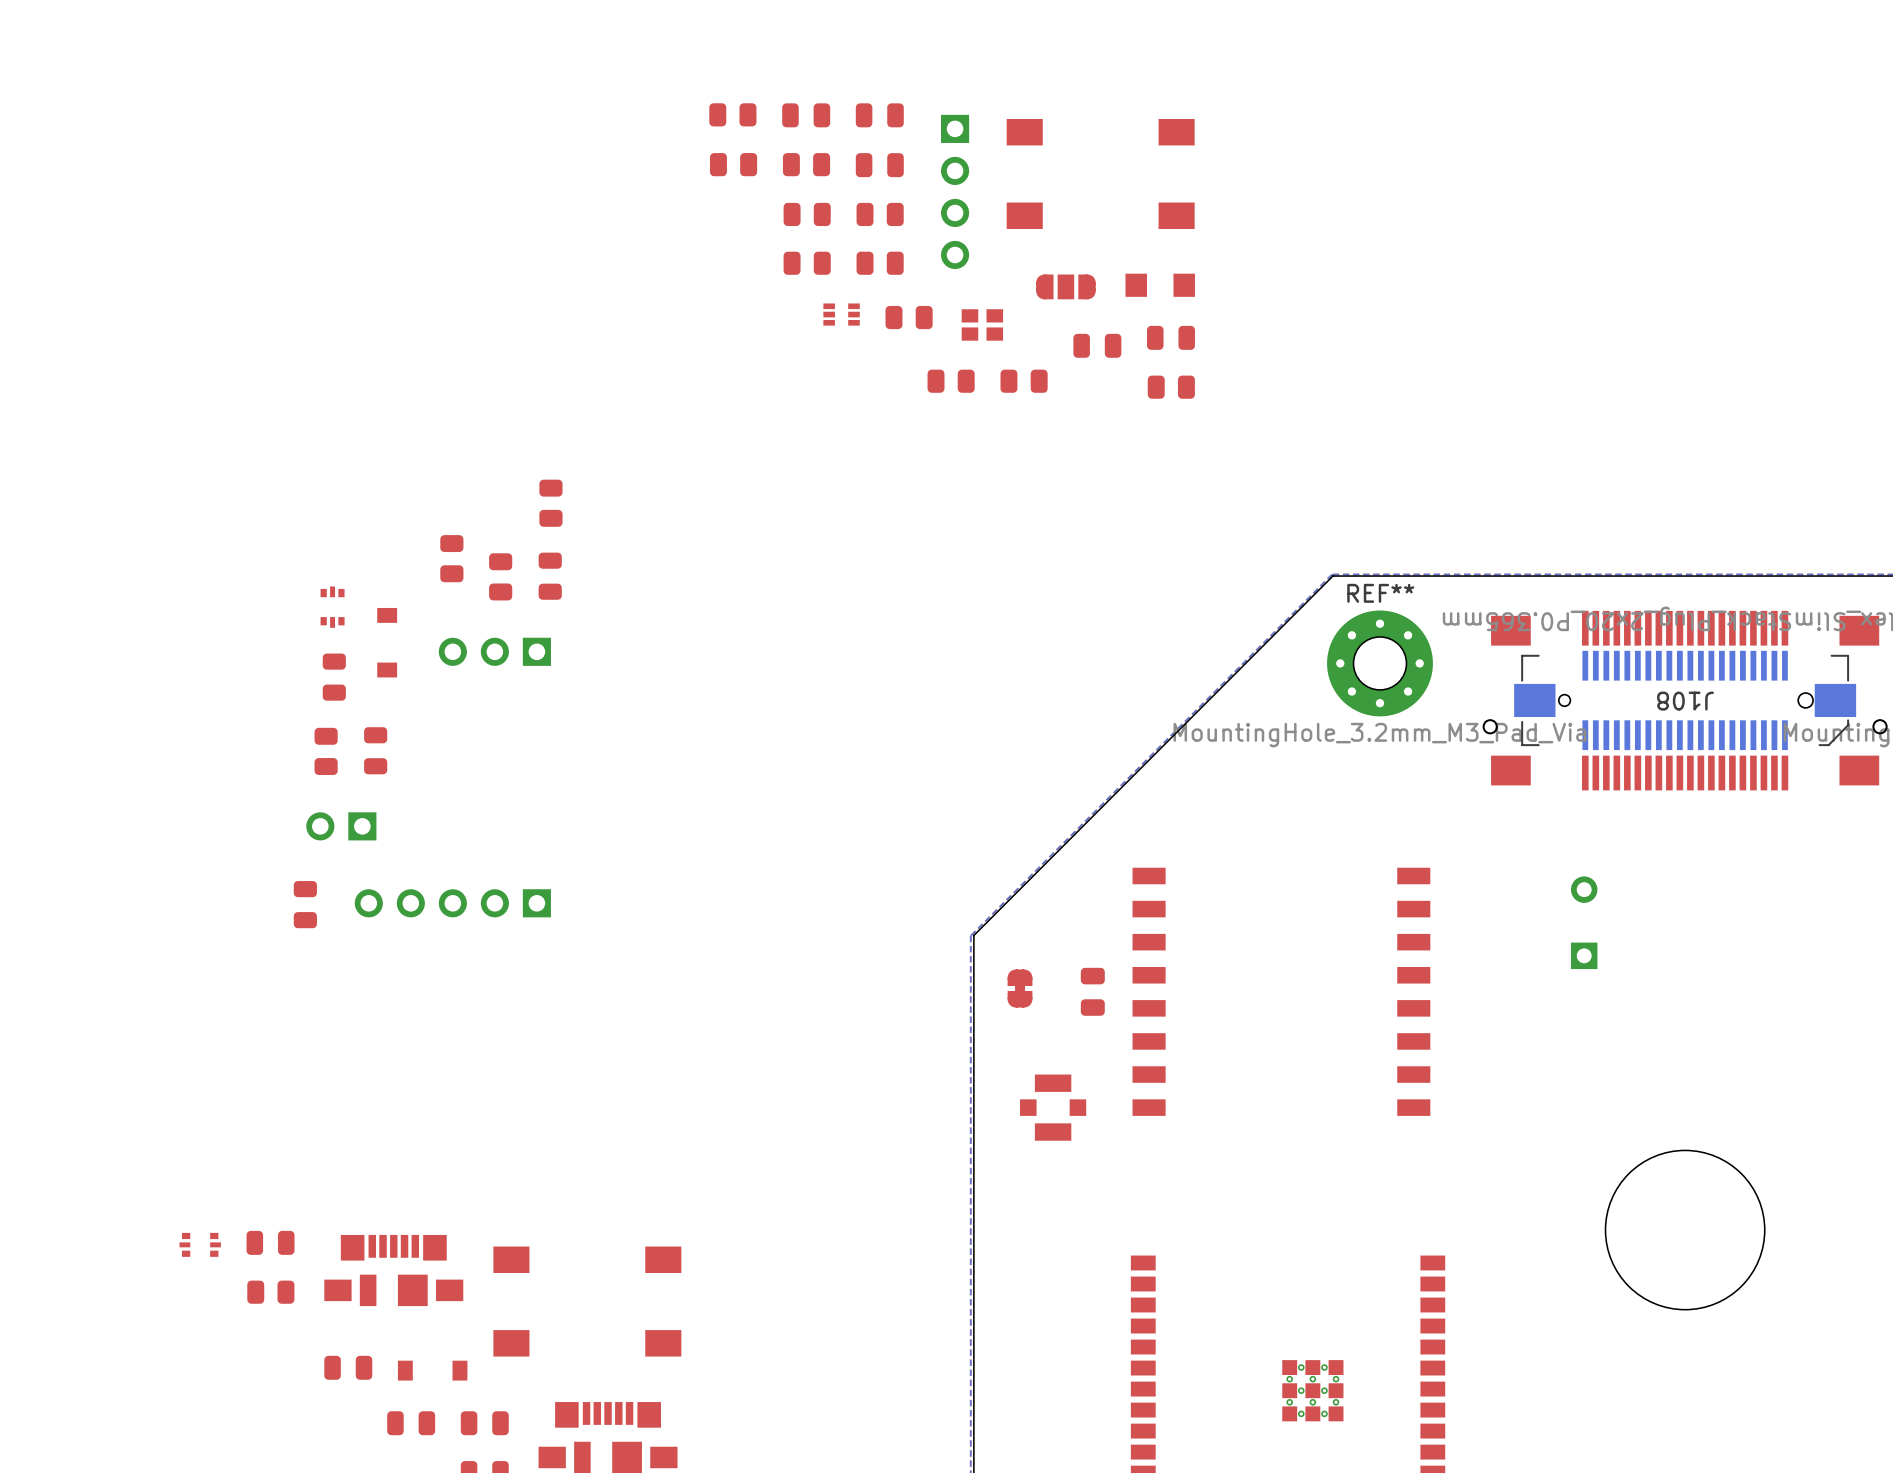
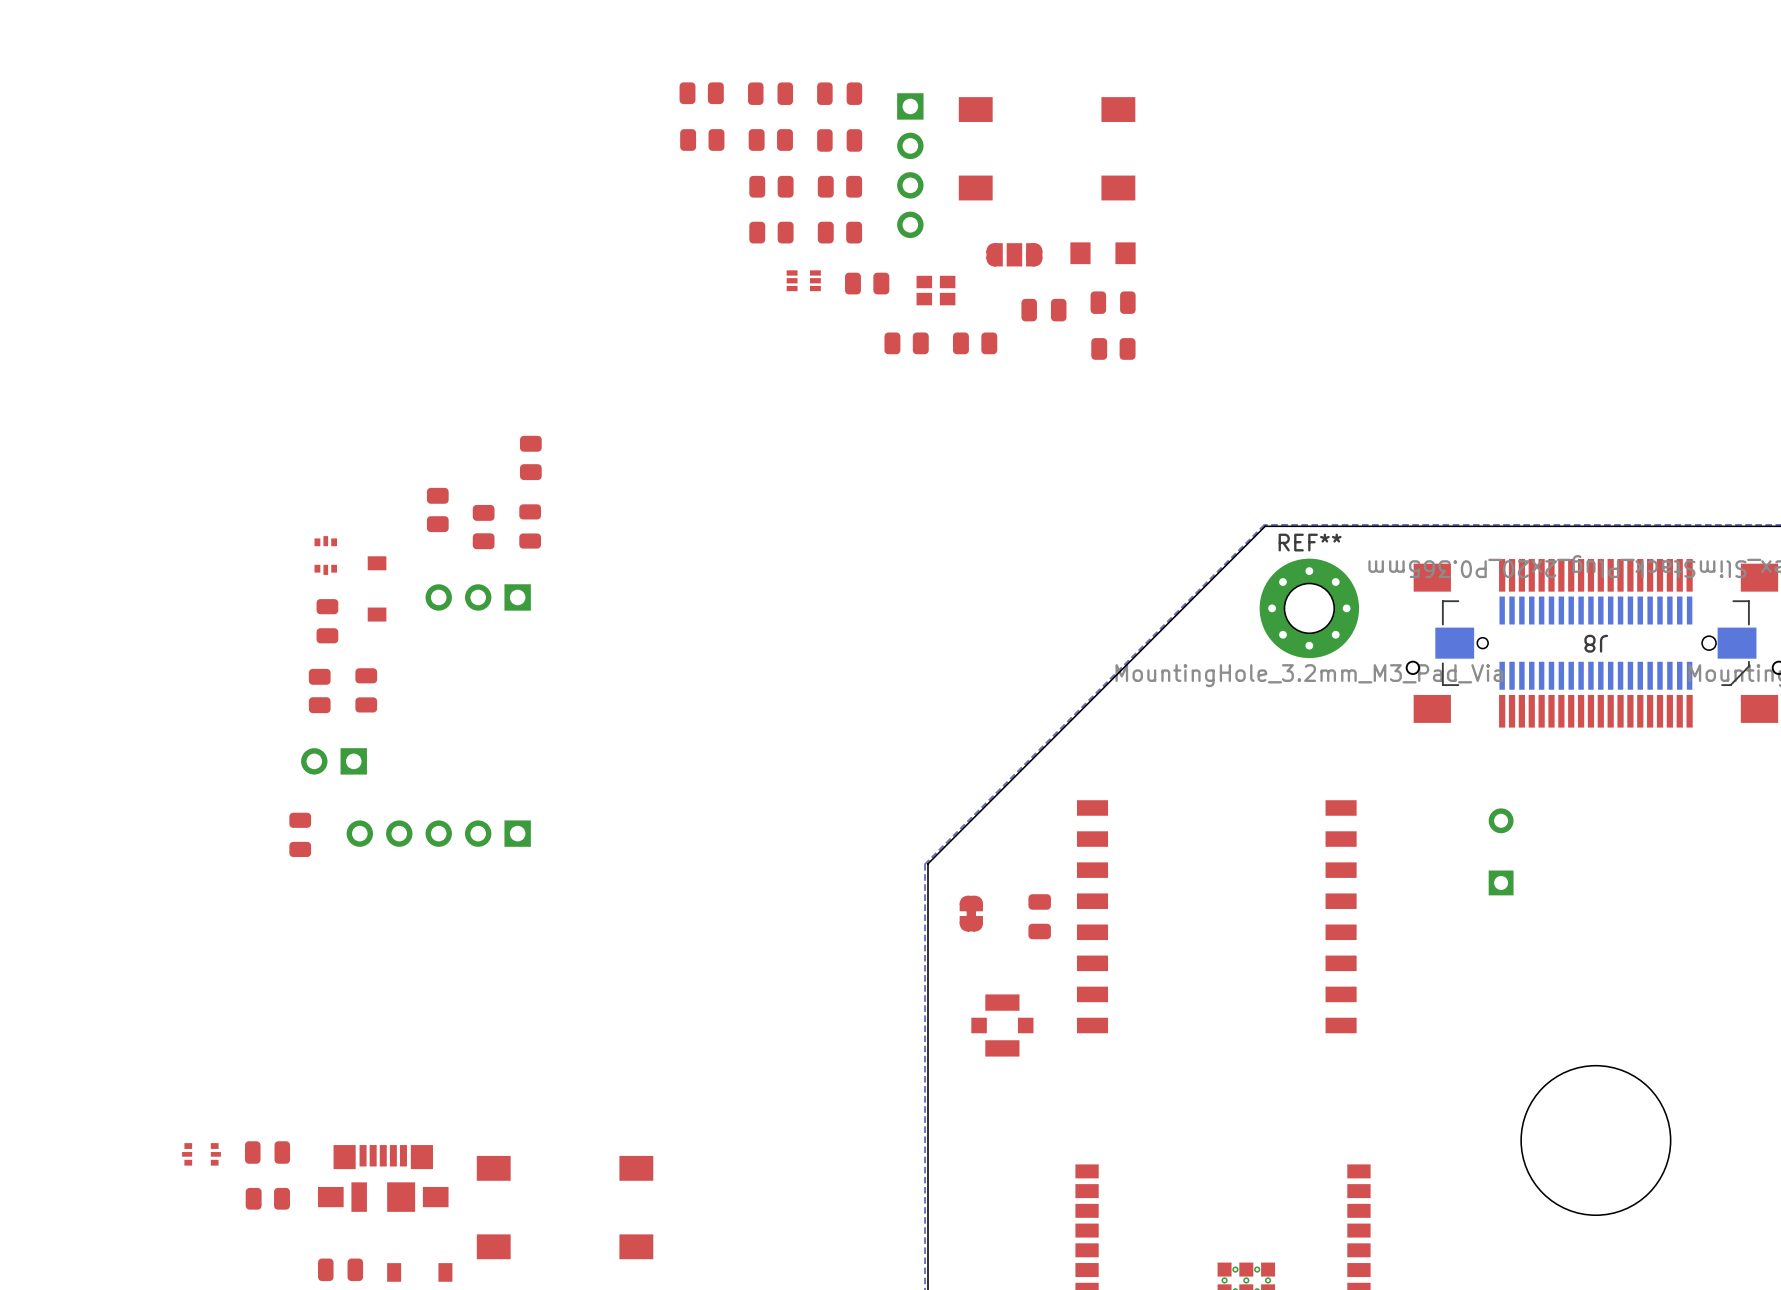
J108 name: J108 (1685, 701) -> J8 (1596, 643)

